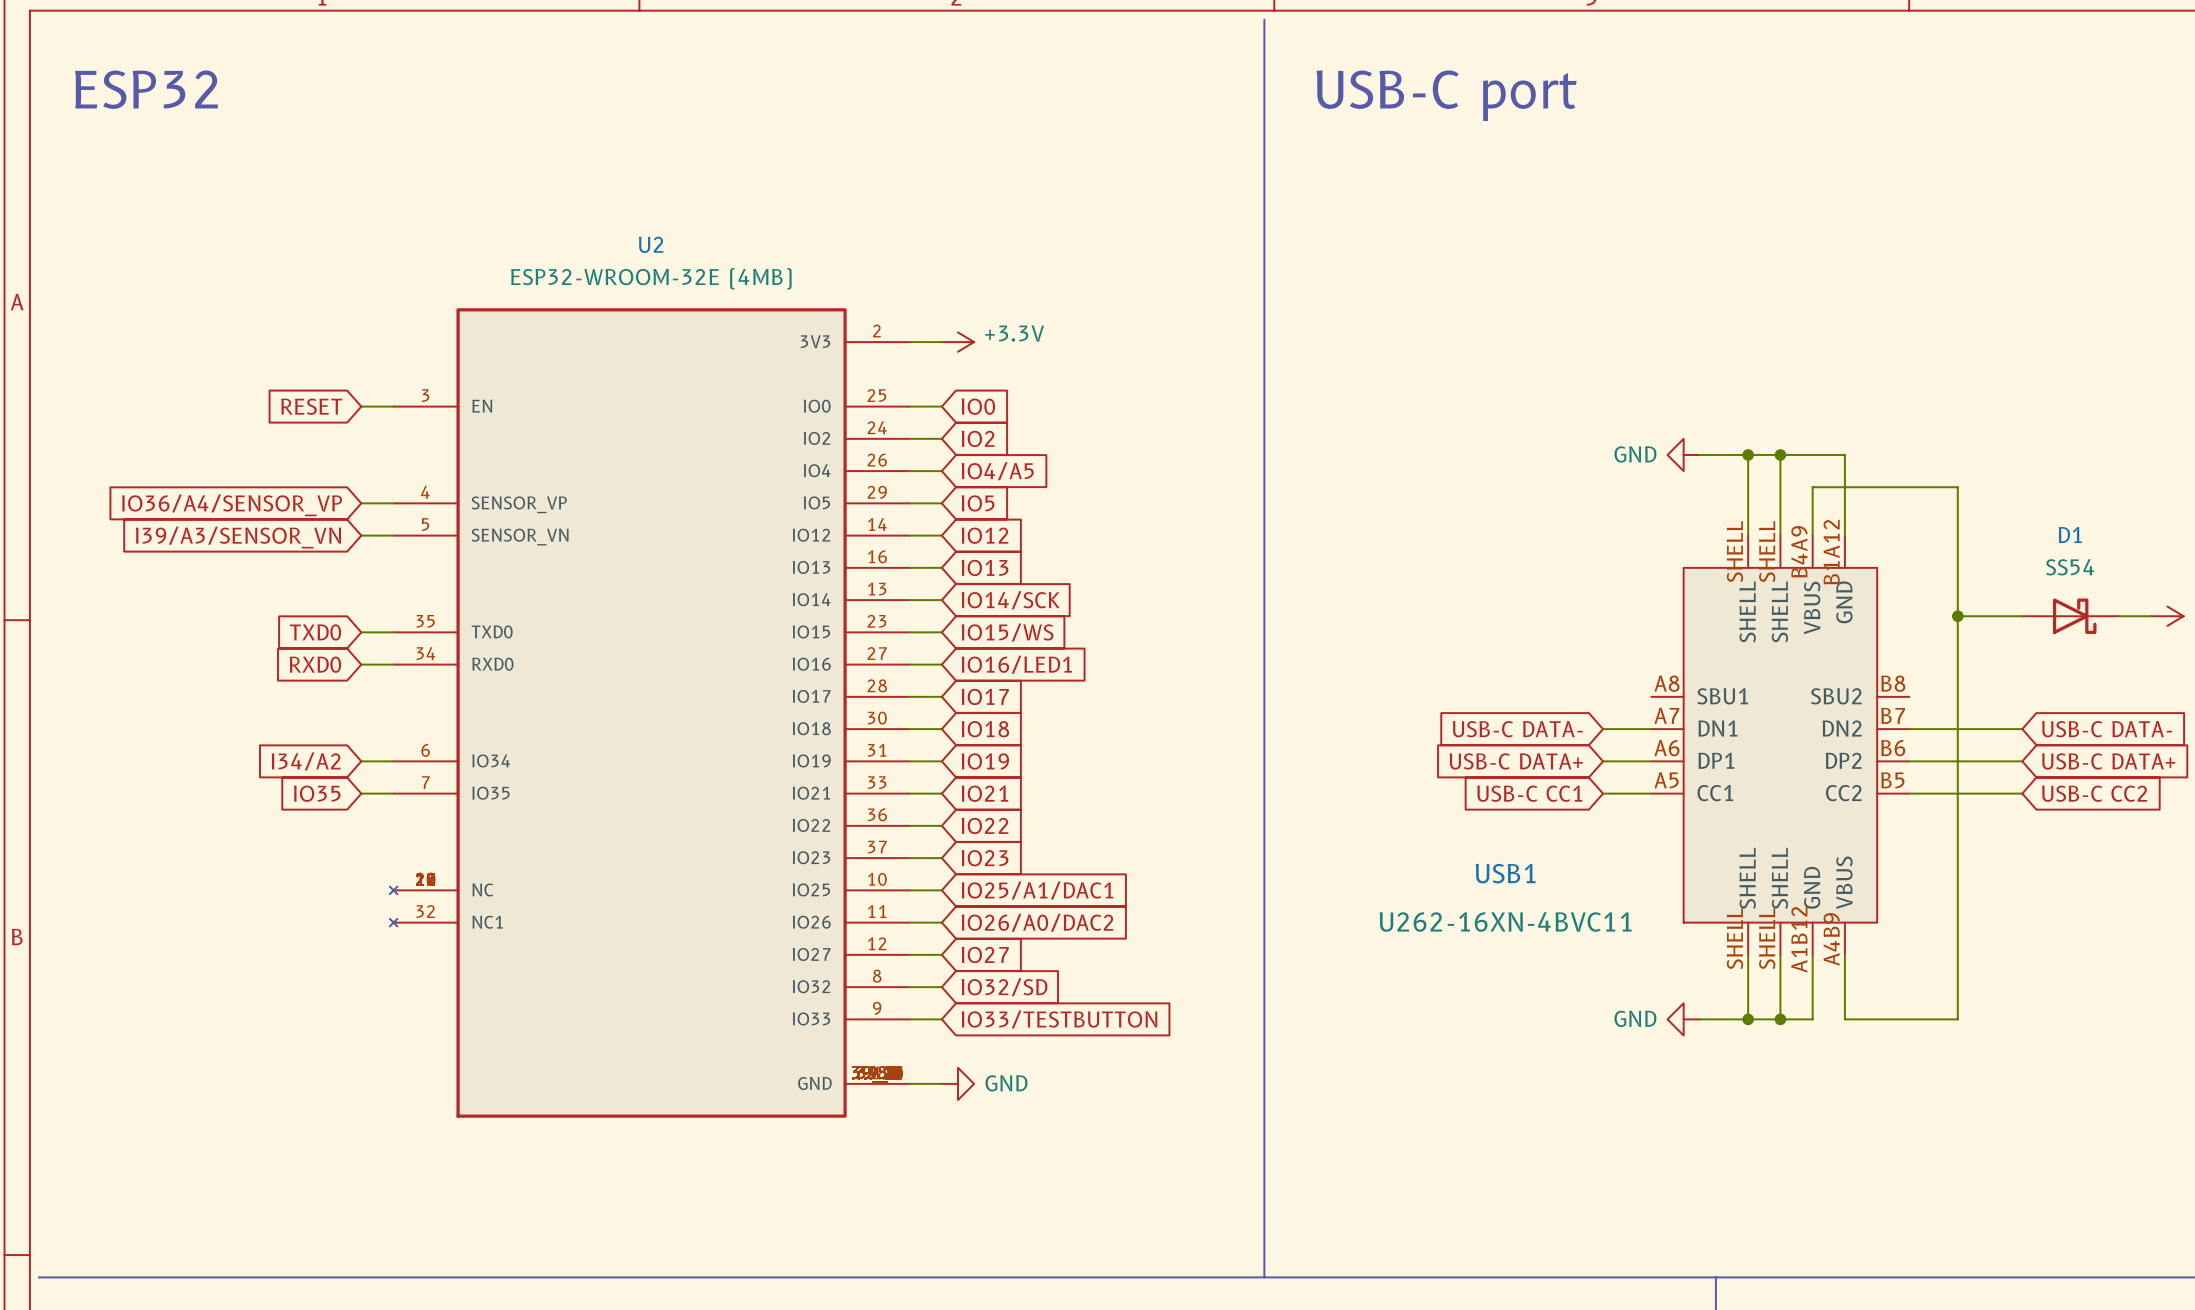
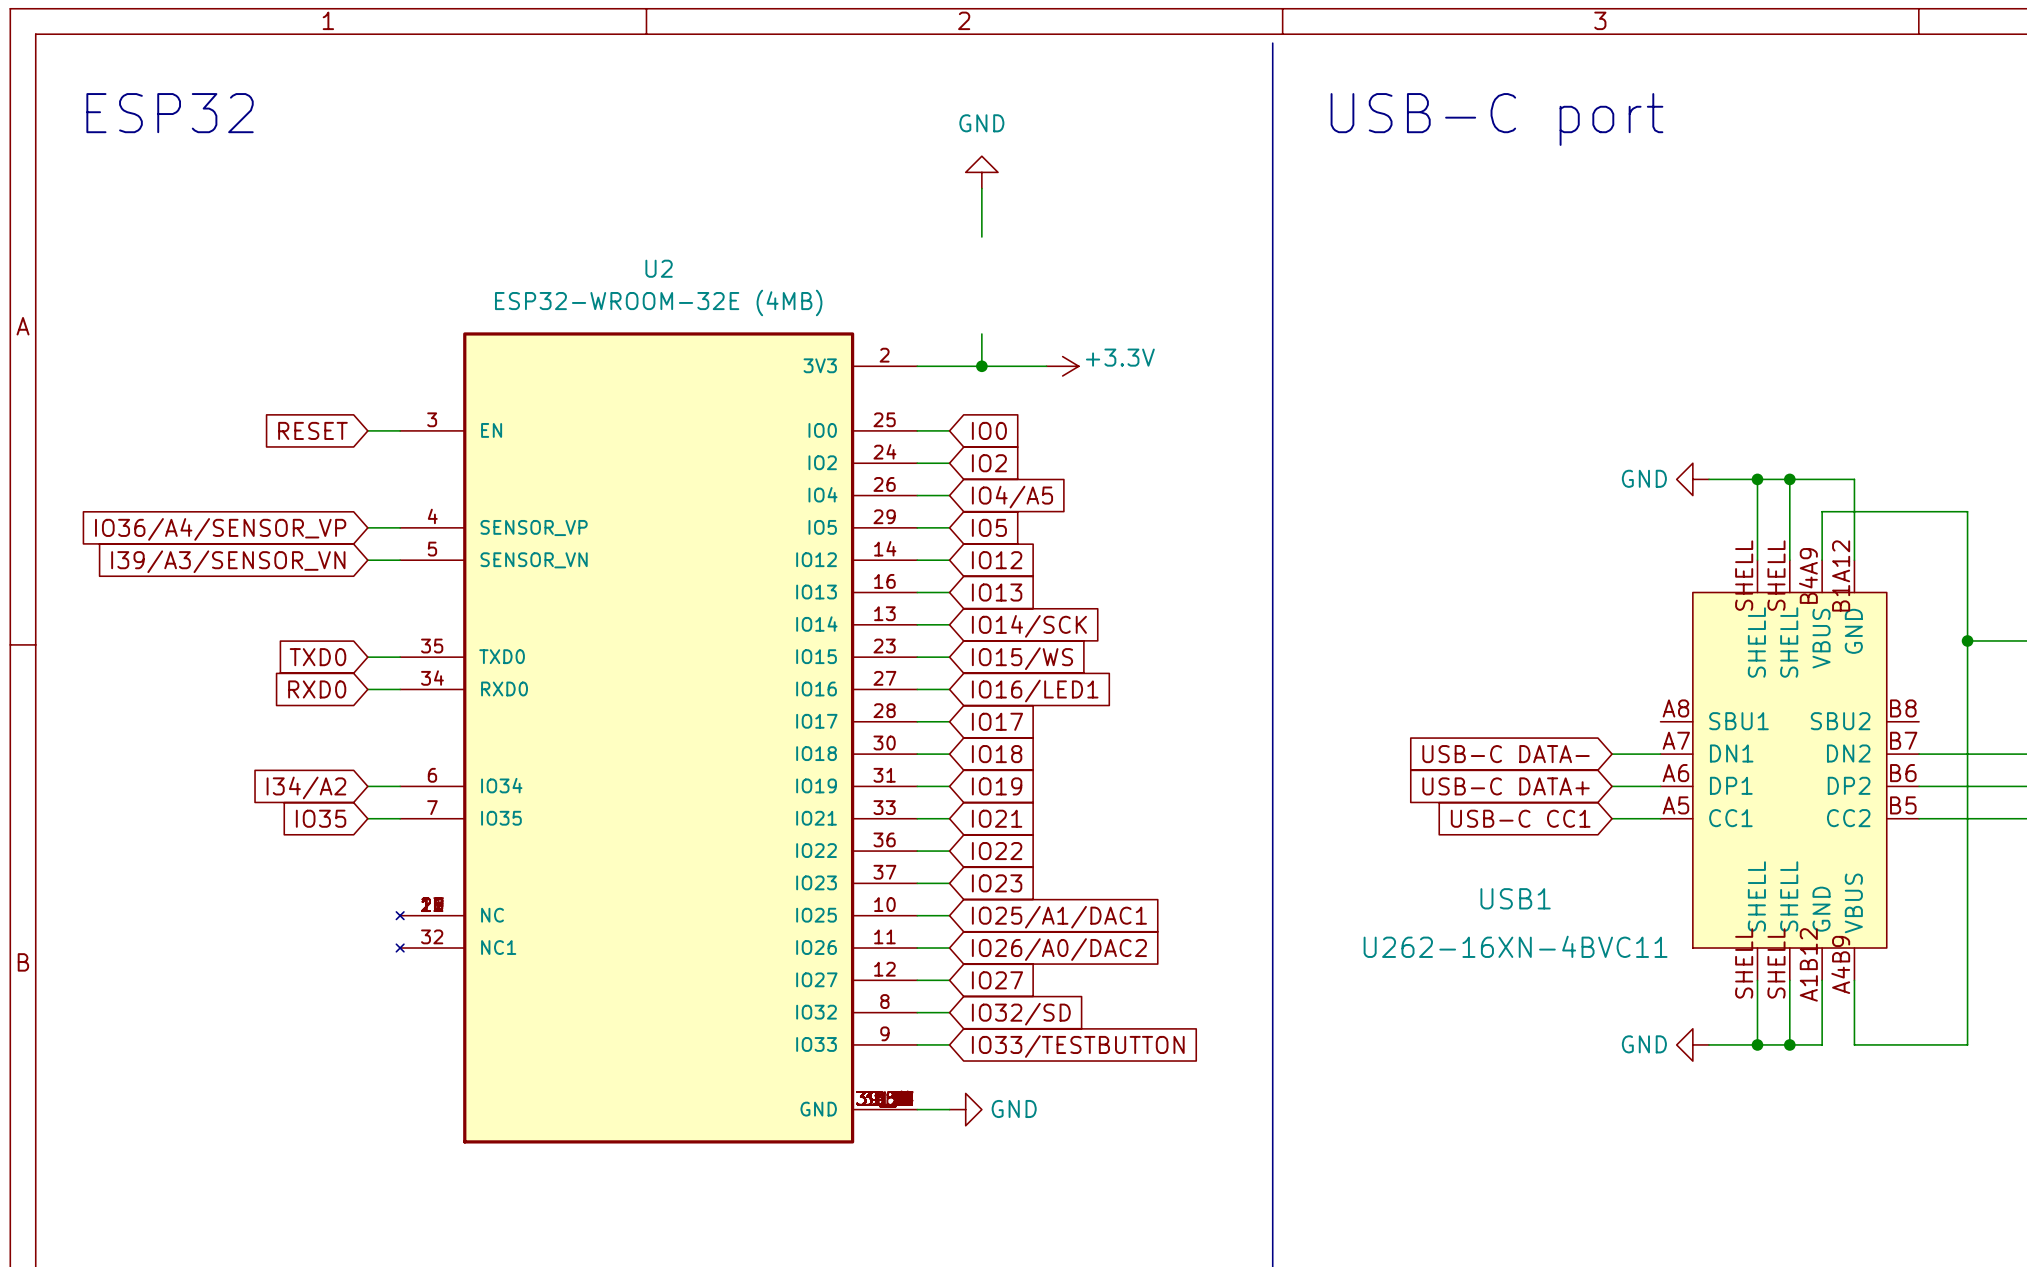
power symbol: none -> GND (981, 172)
wire: none -> (981, 188) (981, 237)
wire: none -> (981, 333) (981, 366)
wire: none -> (949, 366) (1046, 366)
power symbol position: +3.3V (957, 342) -> +3.3V (1062, 366)
junction: none -> (981, 366)

